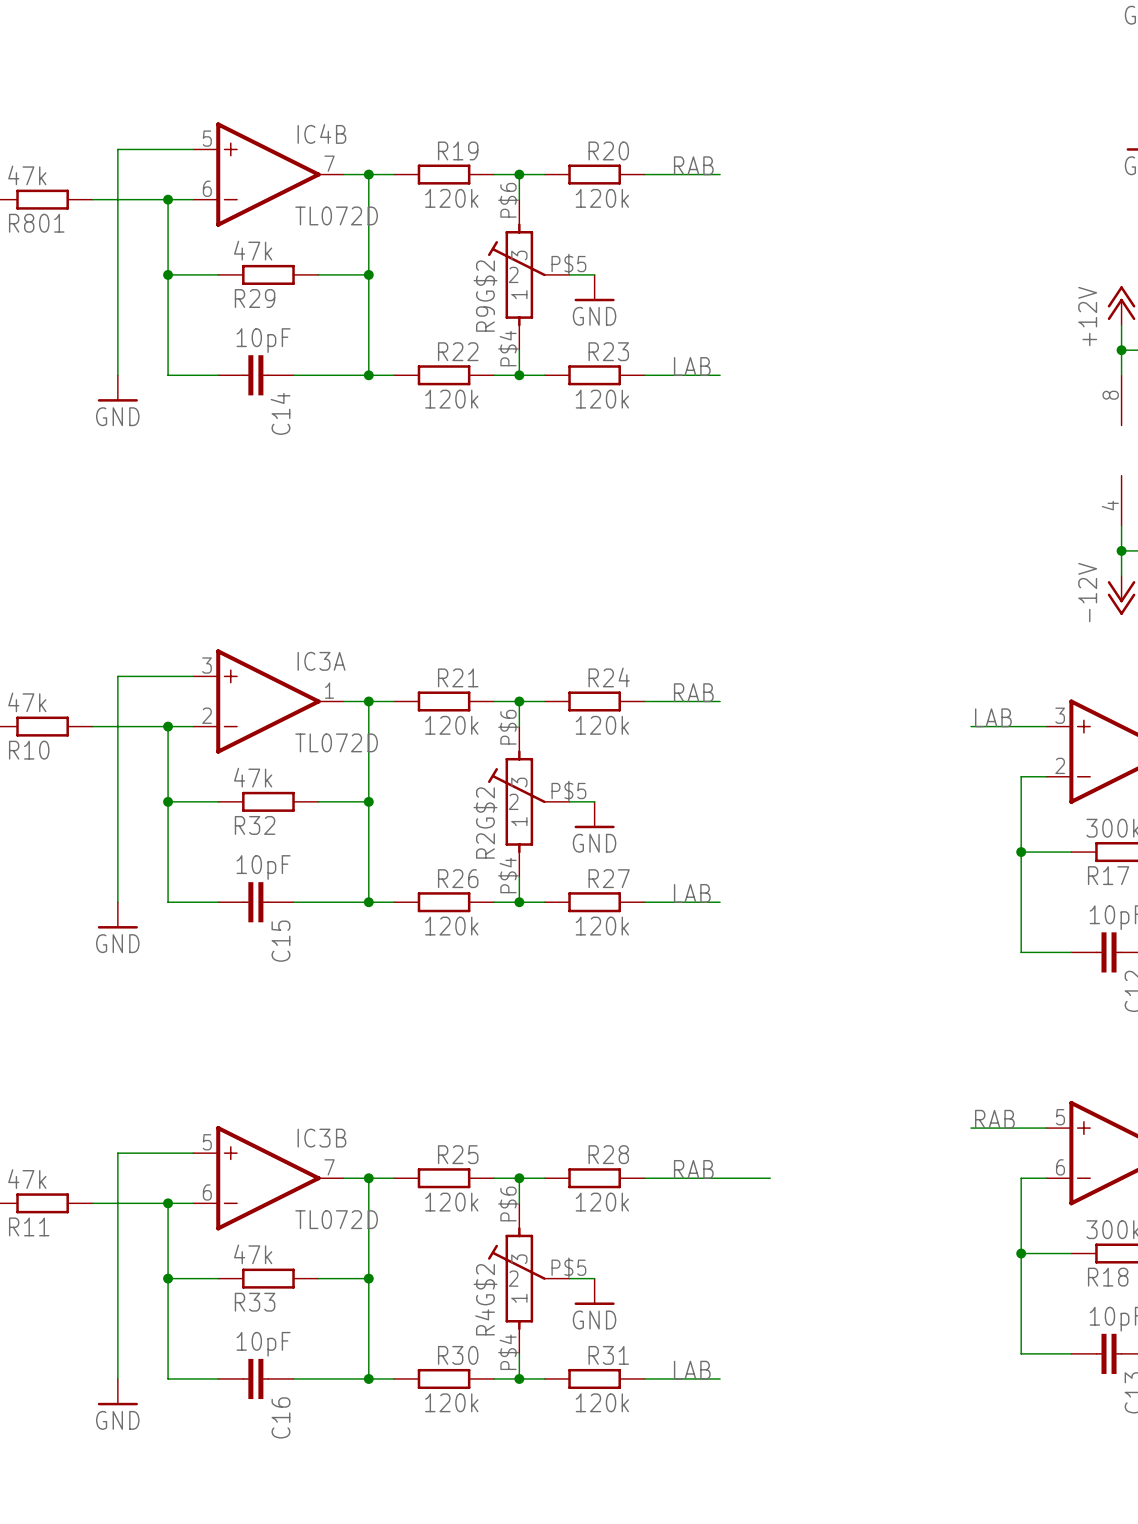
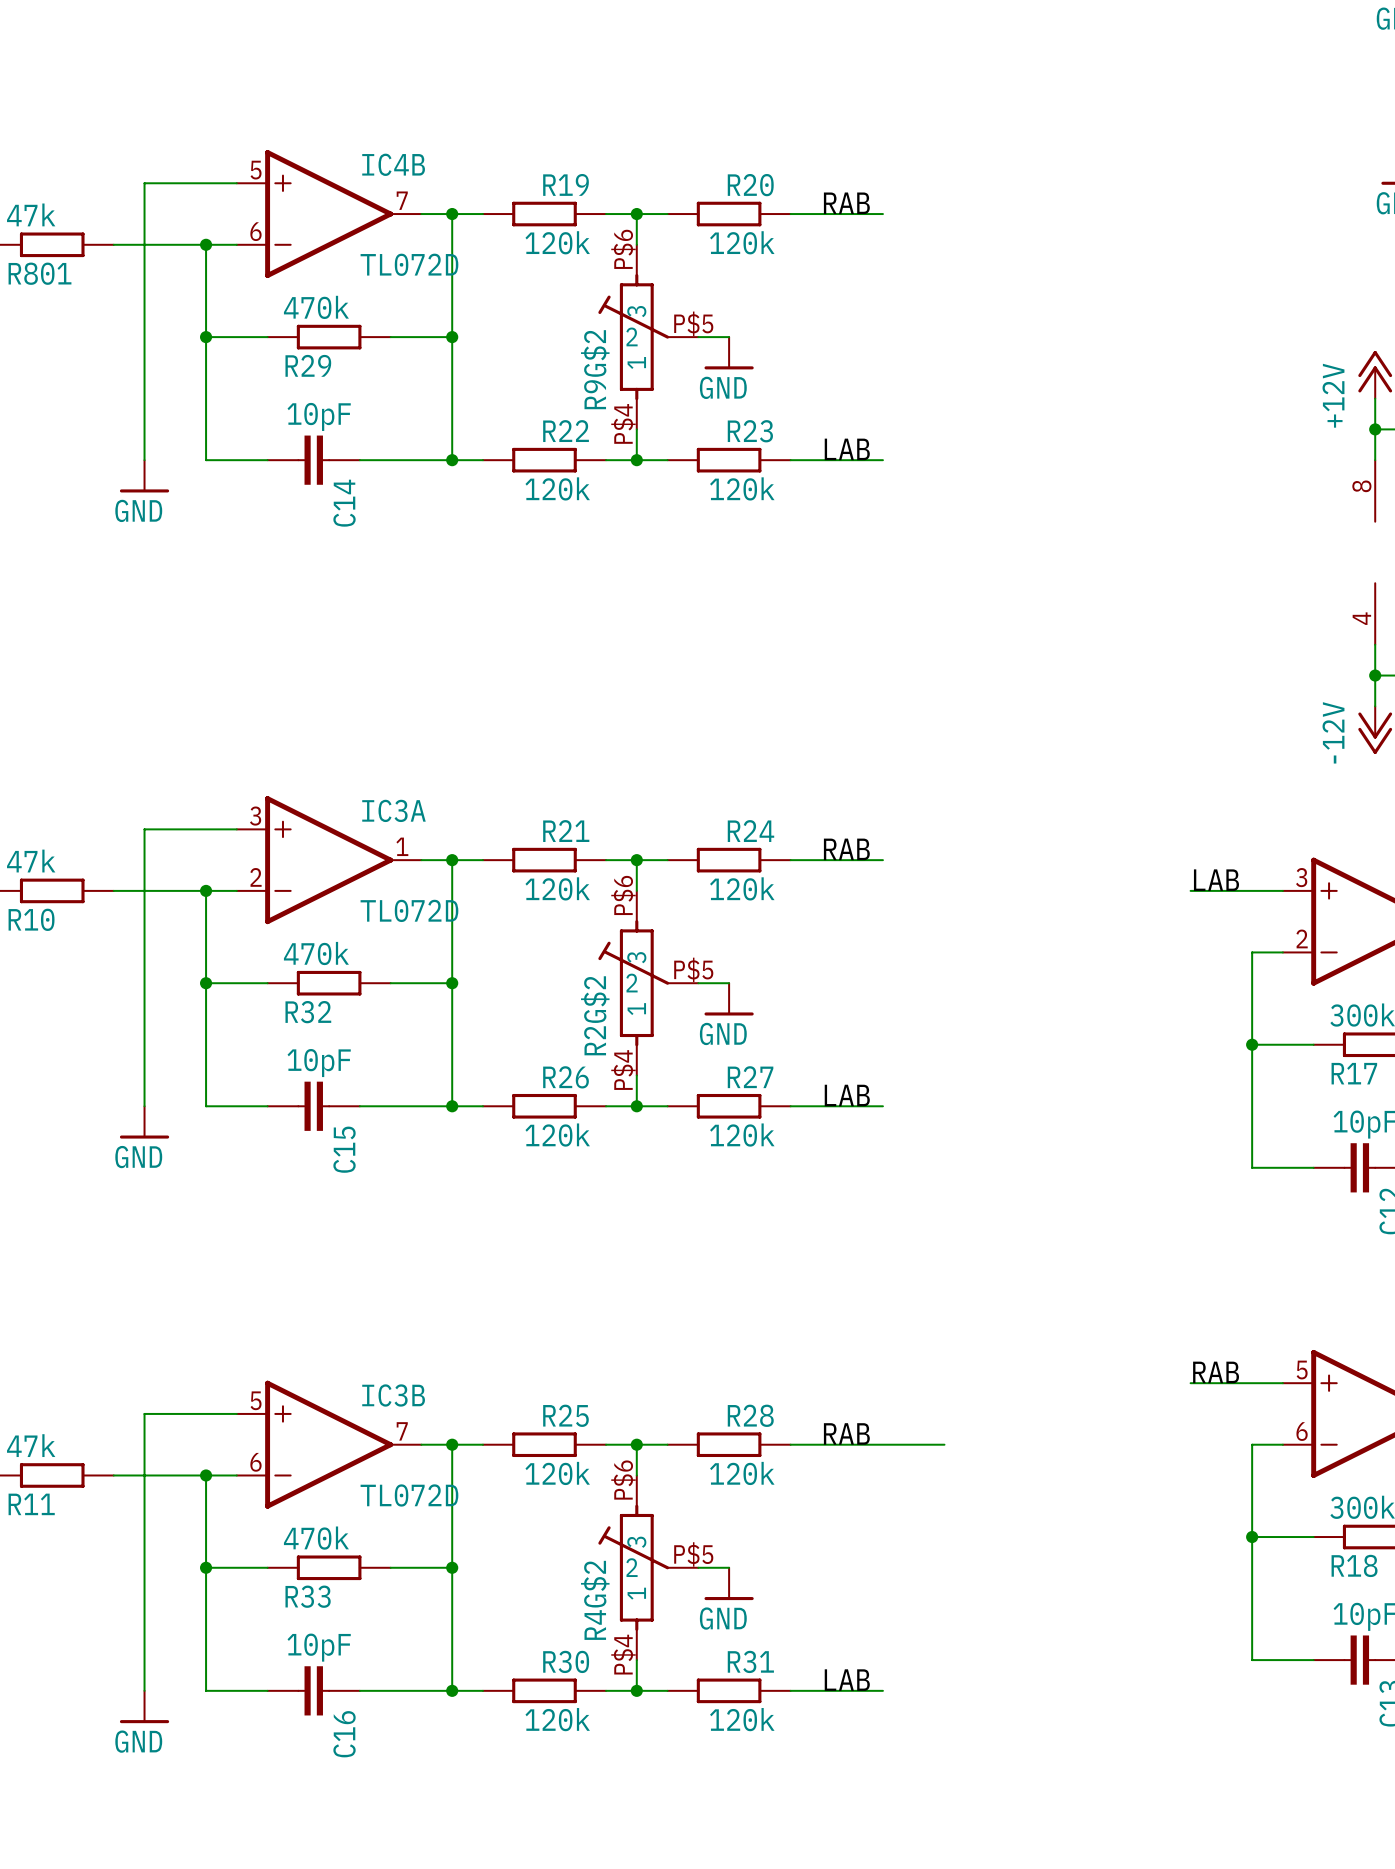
R29 value: 47k (253, 250) -> 470k (316, 307)
R32 value: 47k (253, 777) -> 470k (316, 953)
R33 value: 47k (253, 1254) -> 470k (316, 1538)

